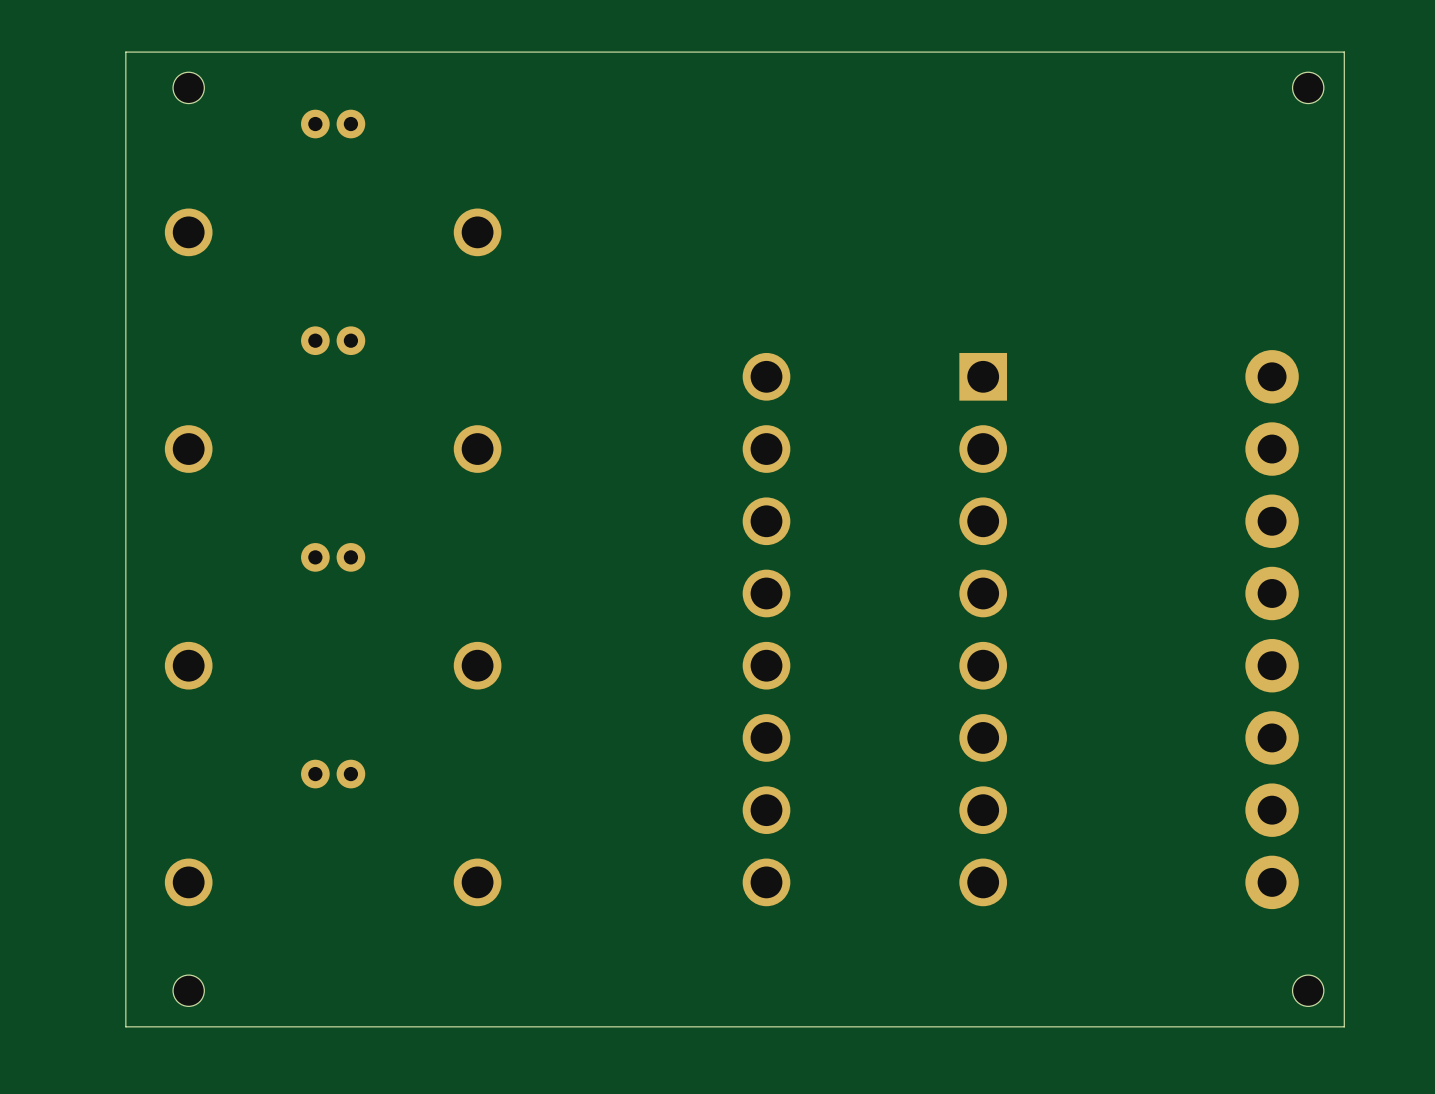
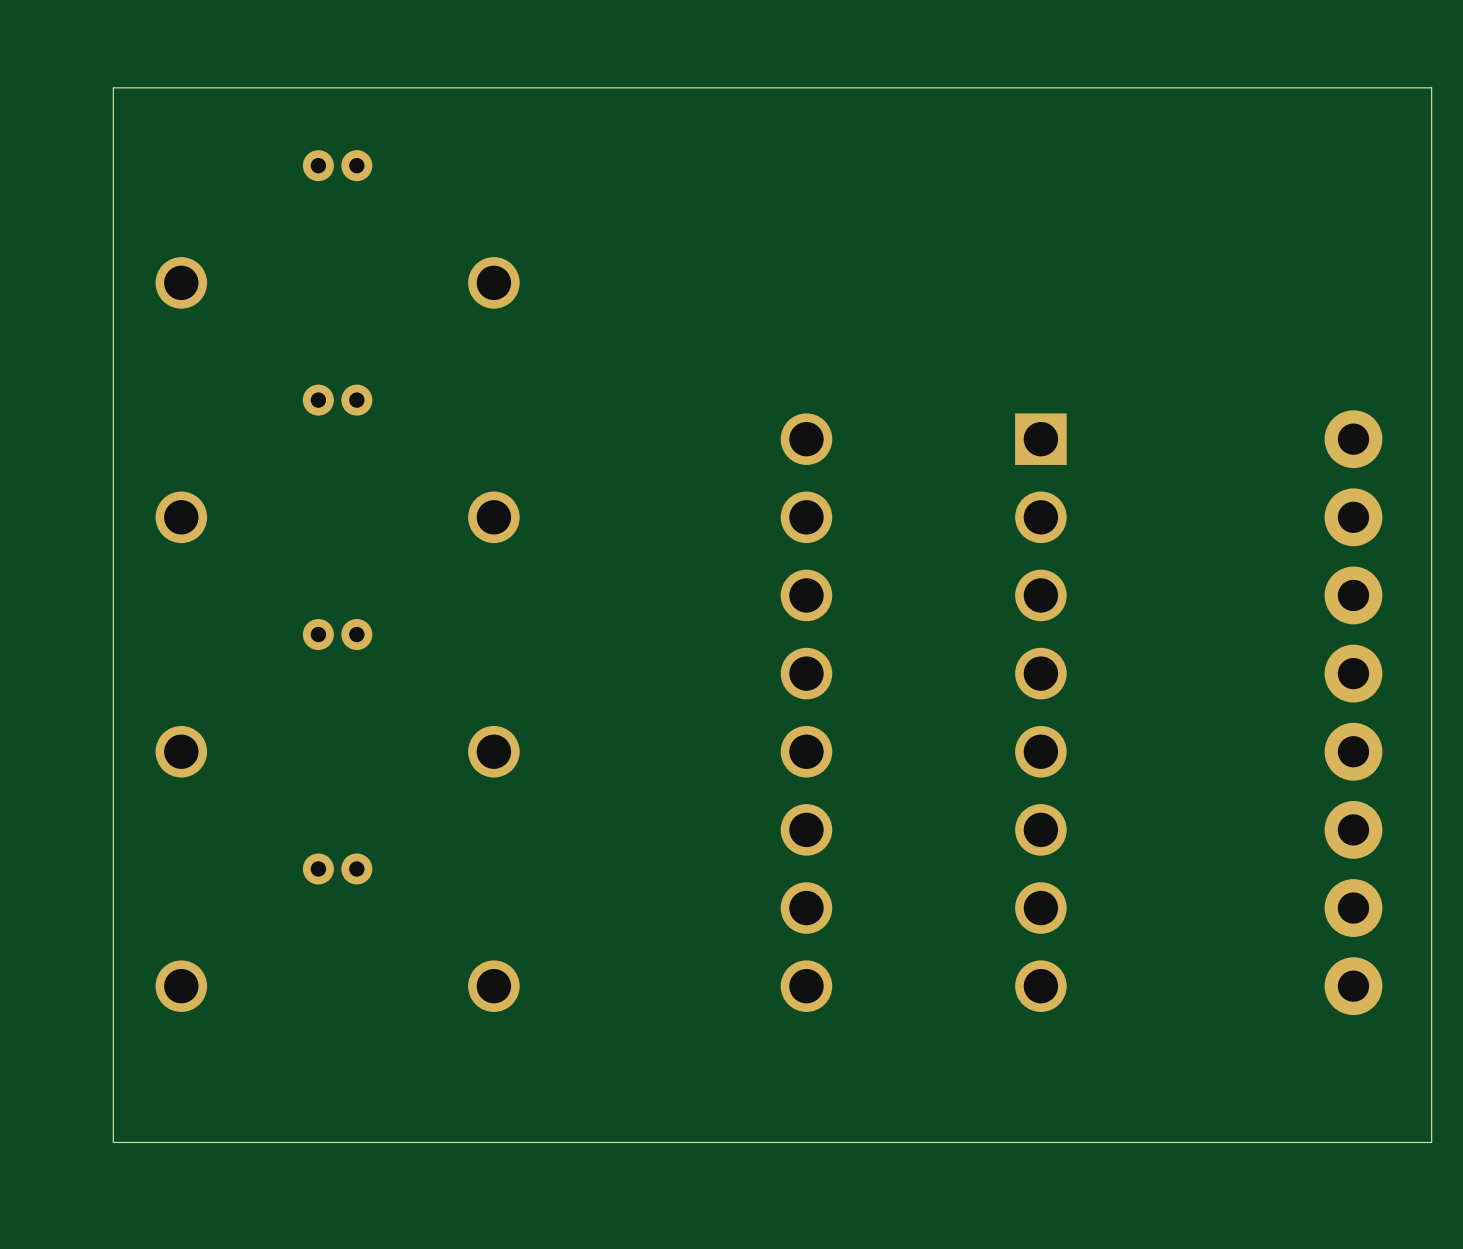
hole: (188, 87) -> none
hole: (1308, 87) -> none
hole: (188, 990) -> none
hole: (1308, 990) -> none

